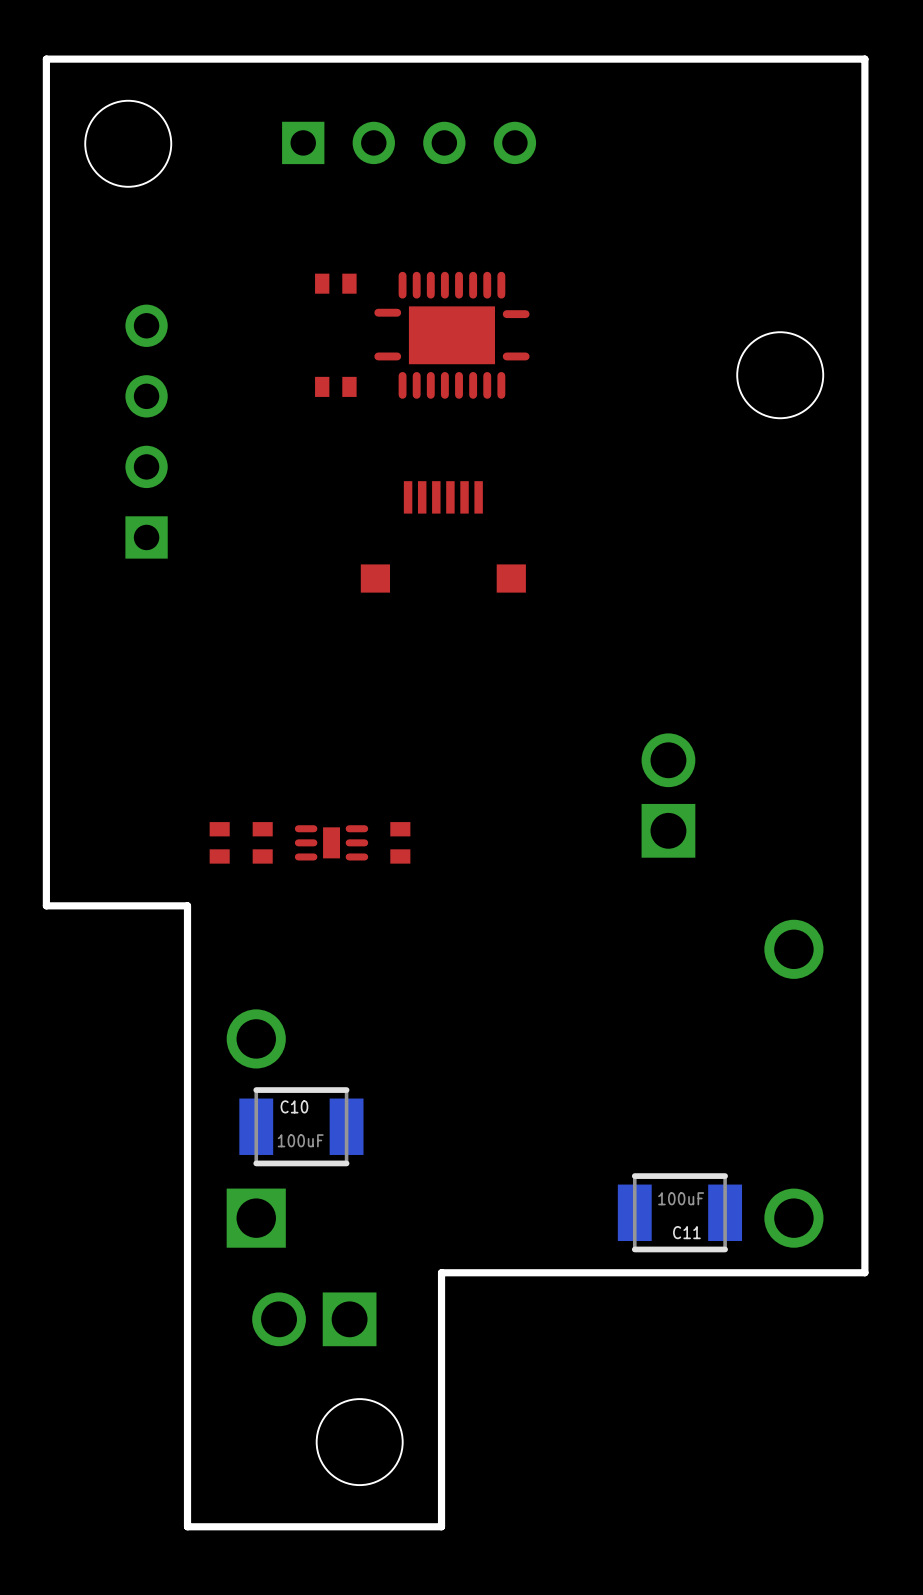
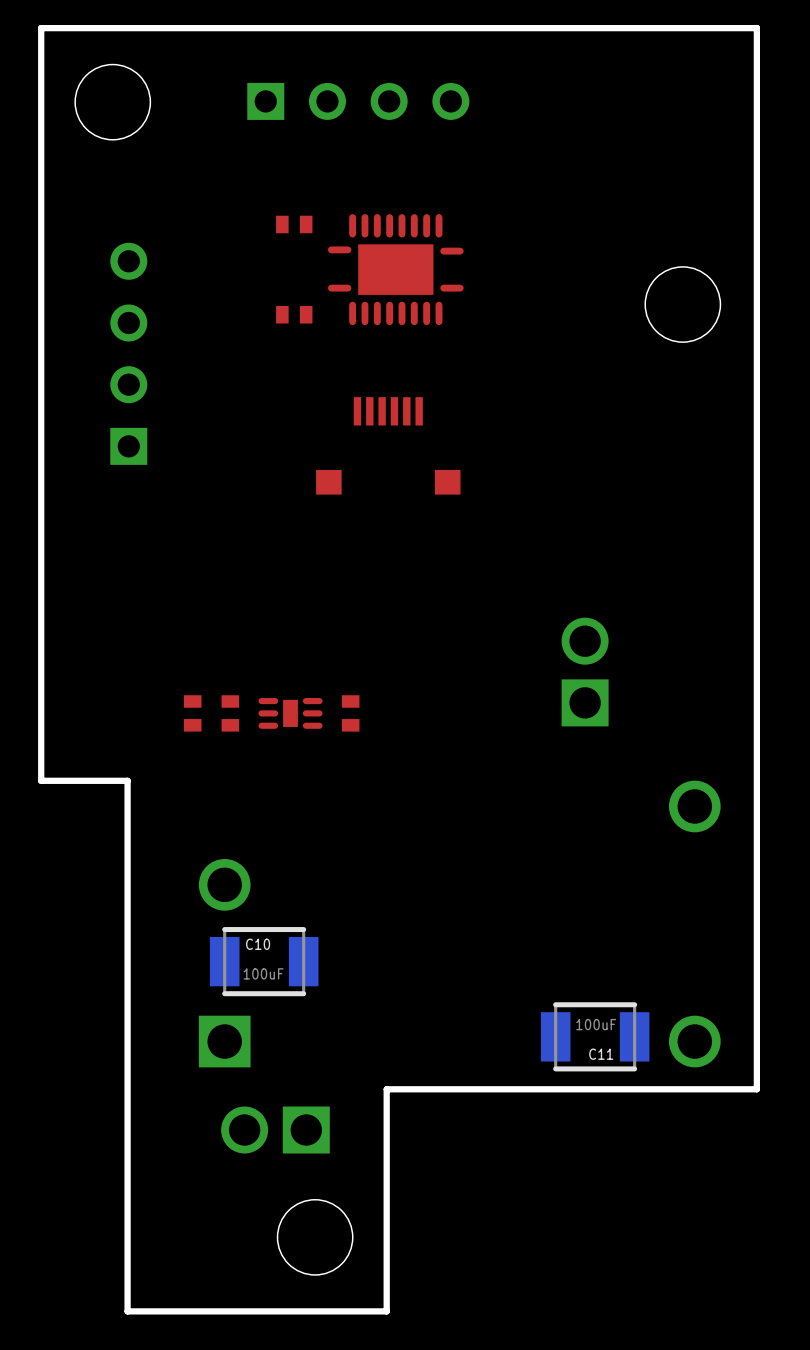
board edge: (46, 905) (187, 905) (187, 1526) -> (41, 768) (41, 780) (127, 780) (127, 1311) (164, 1311)

